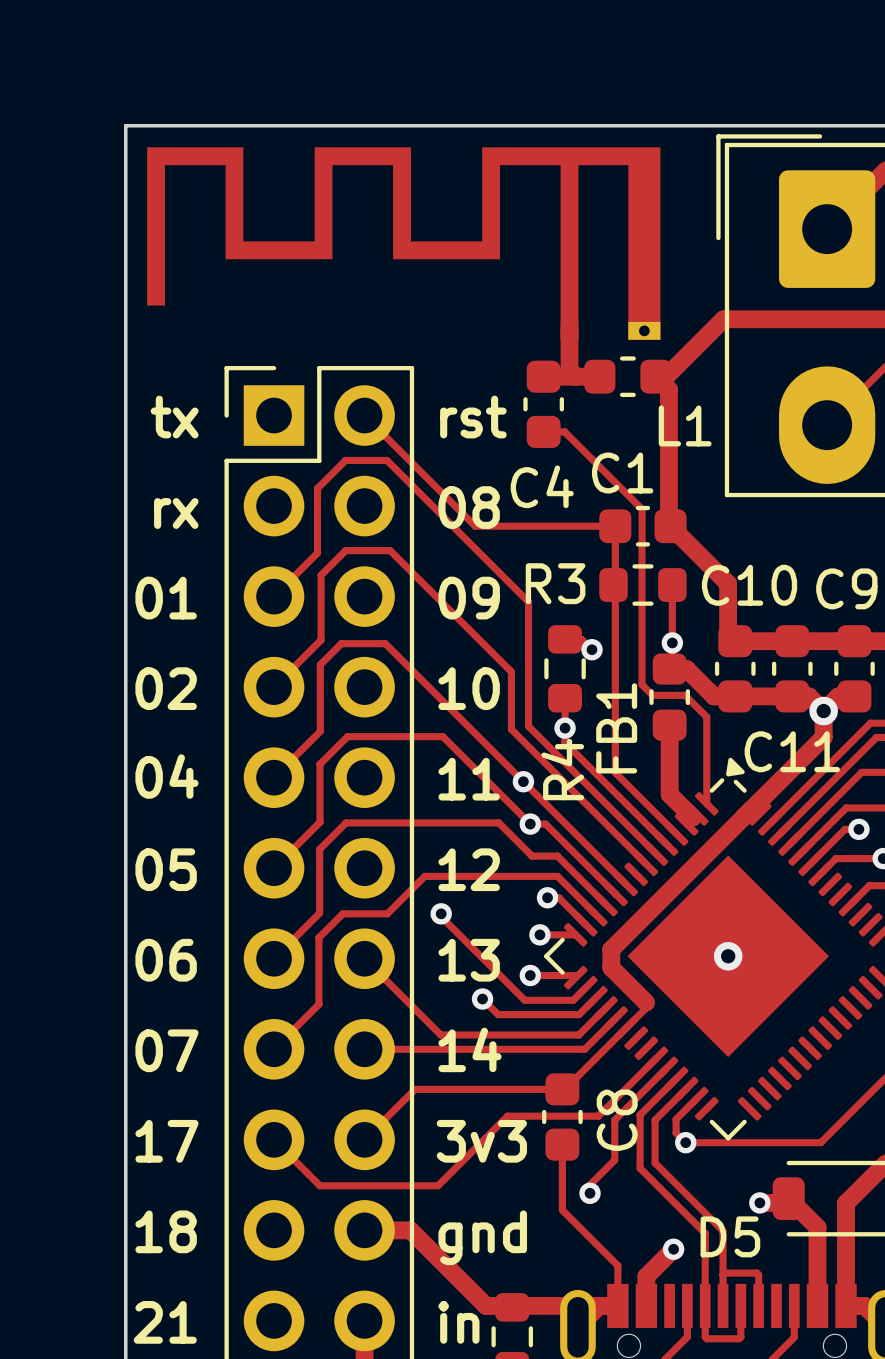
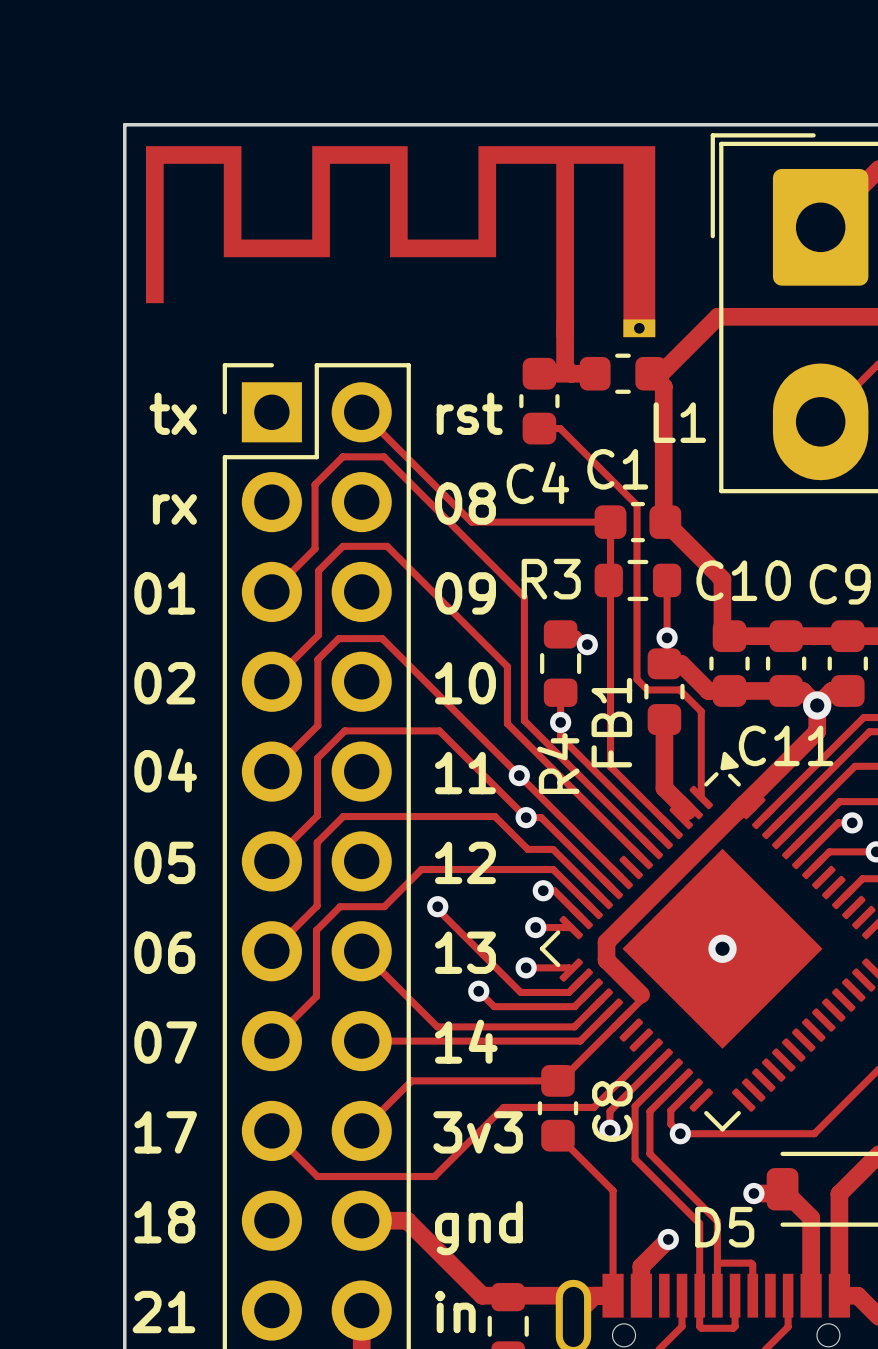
track: (614, 1139) (614, 1160) (590, 1184) (590, 1193) -> none
track: (562, 1144) (562, 1210) (617, 1265) -> (557, 1135) (613, 1190) (613, 1255)
via position: (590, 1193) -> (609, 1130)

